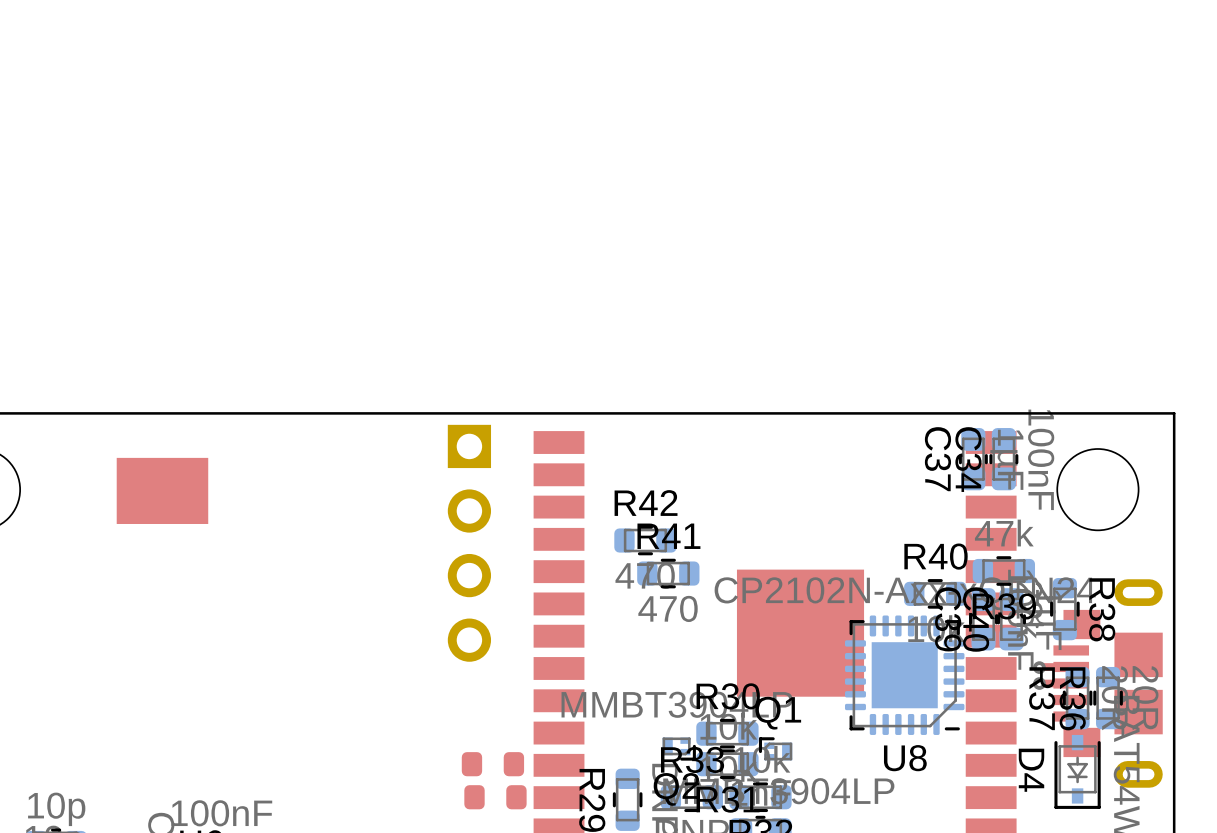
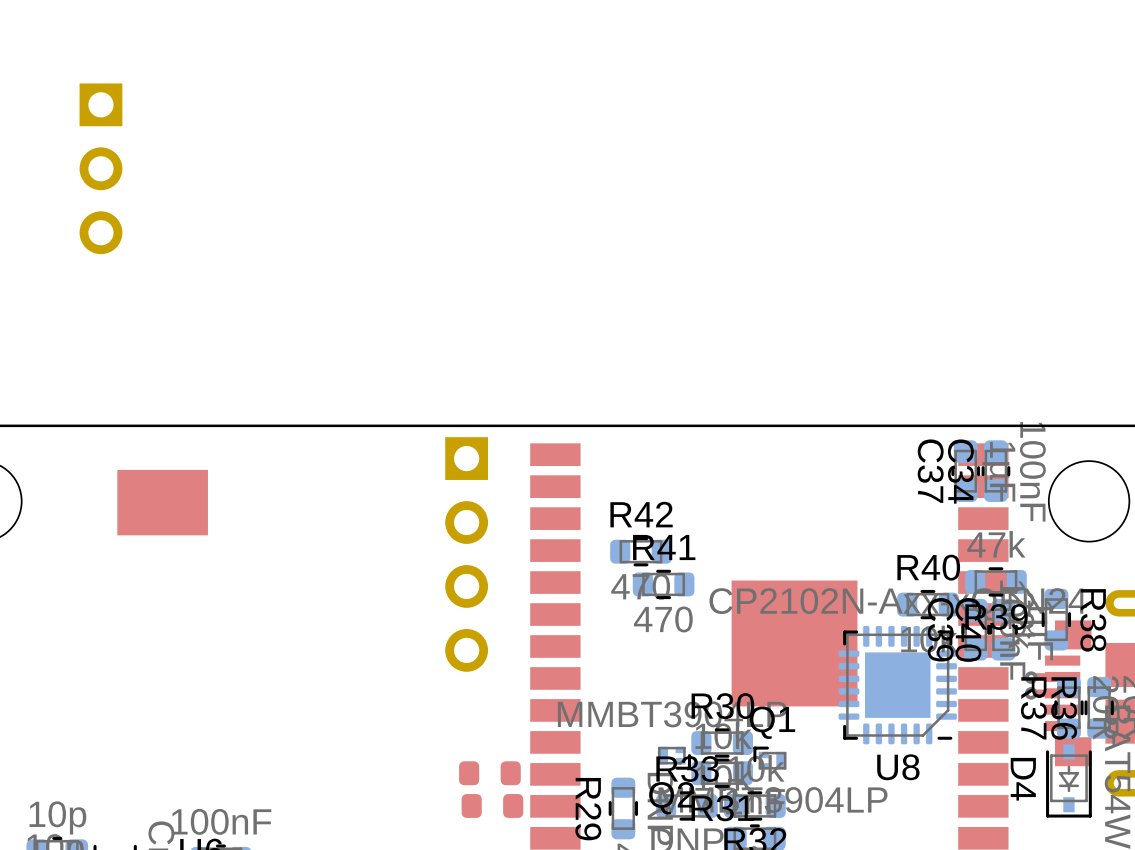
part: none -> (100, 168)

